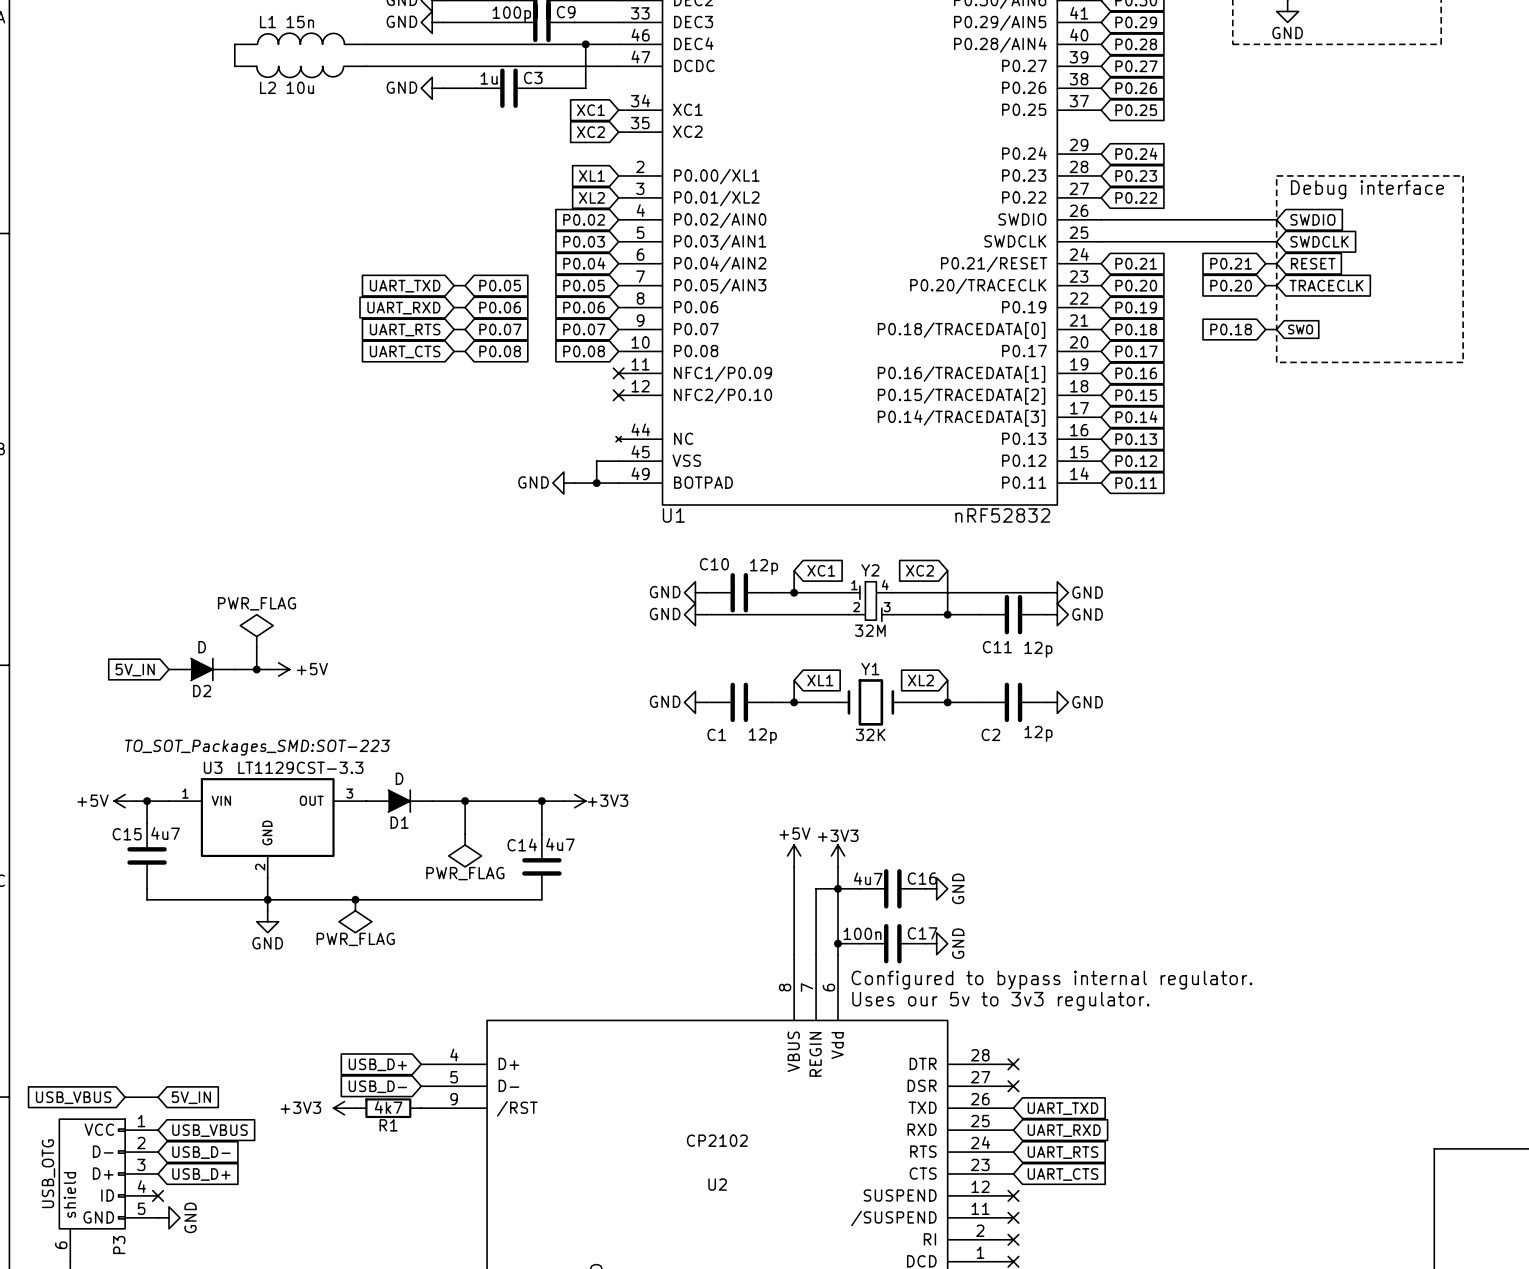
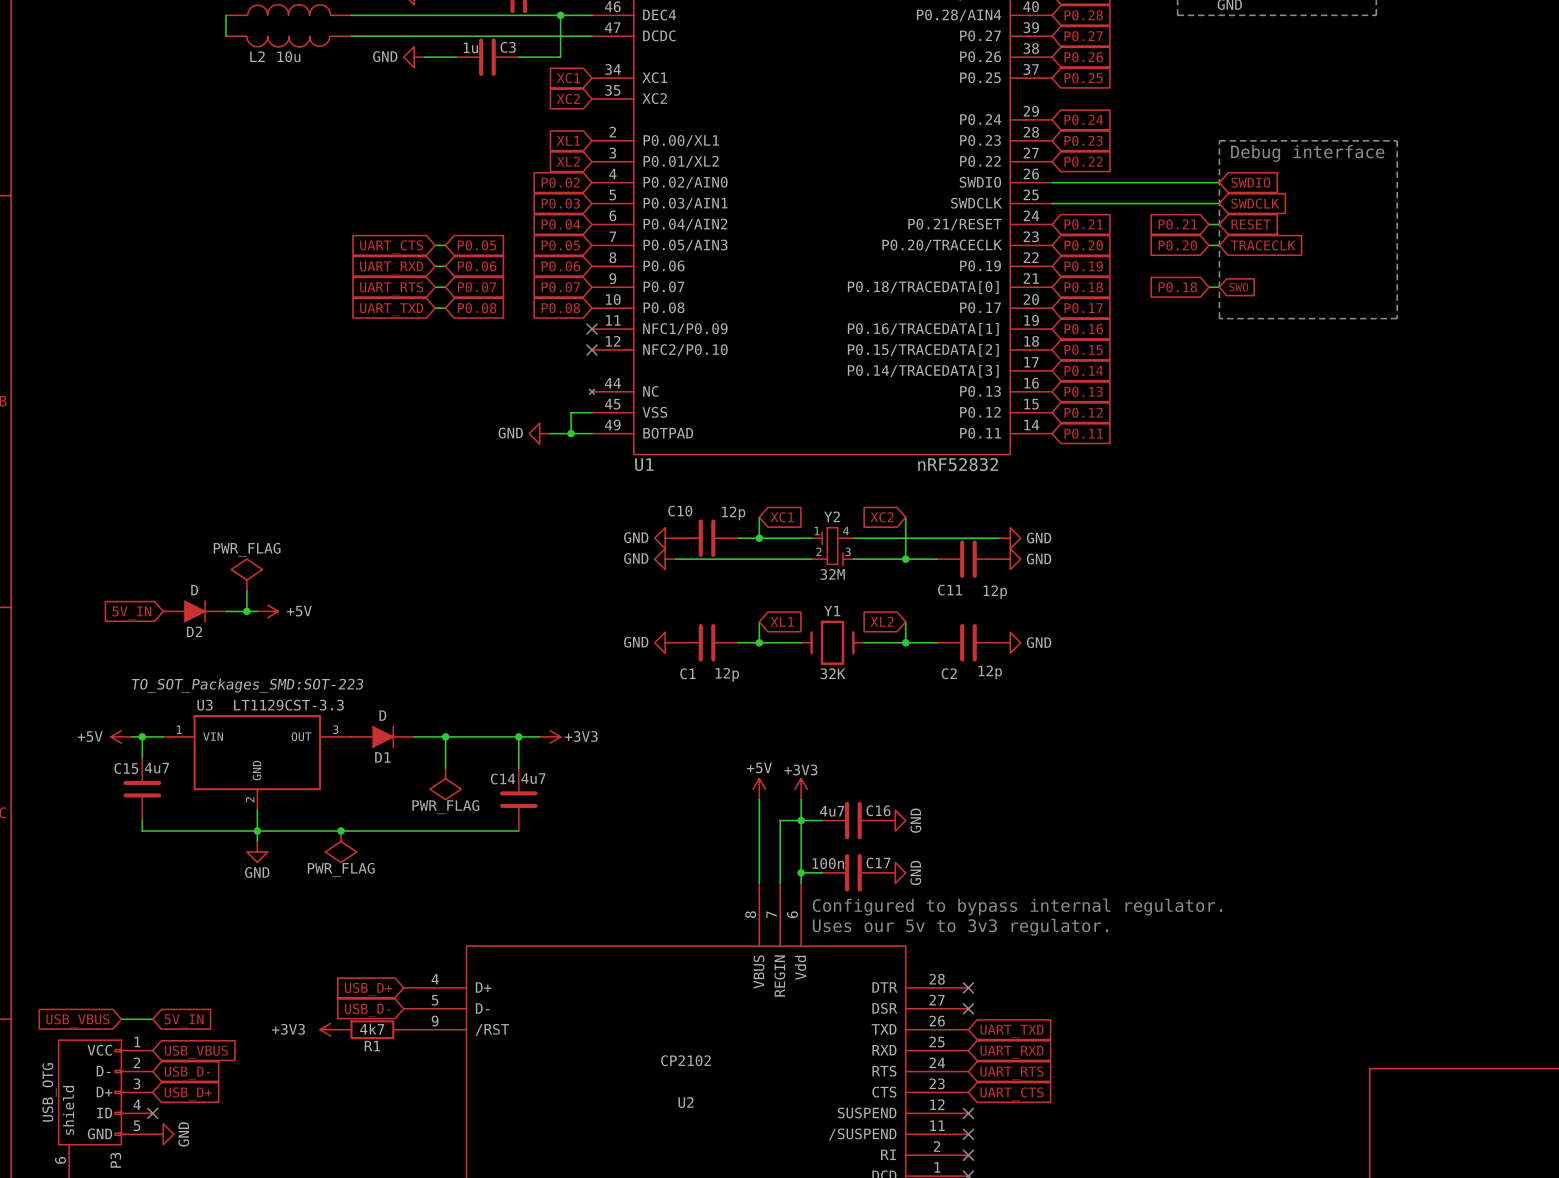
global label: UART_TXD (405, 286) -> UART_CTS (391, 246)
global label: UART_CTS (405, 351) -> UART_TXD (391, 309)

